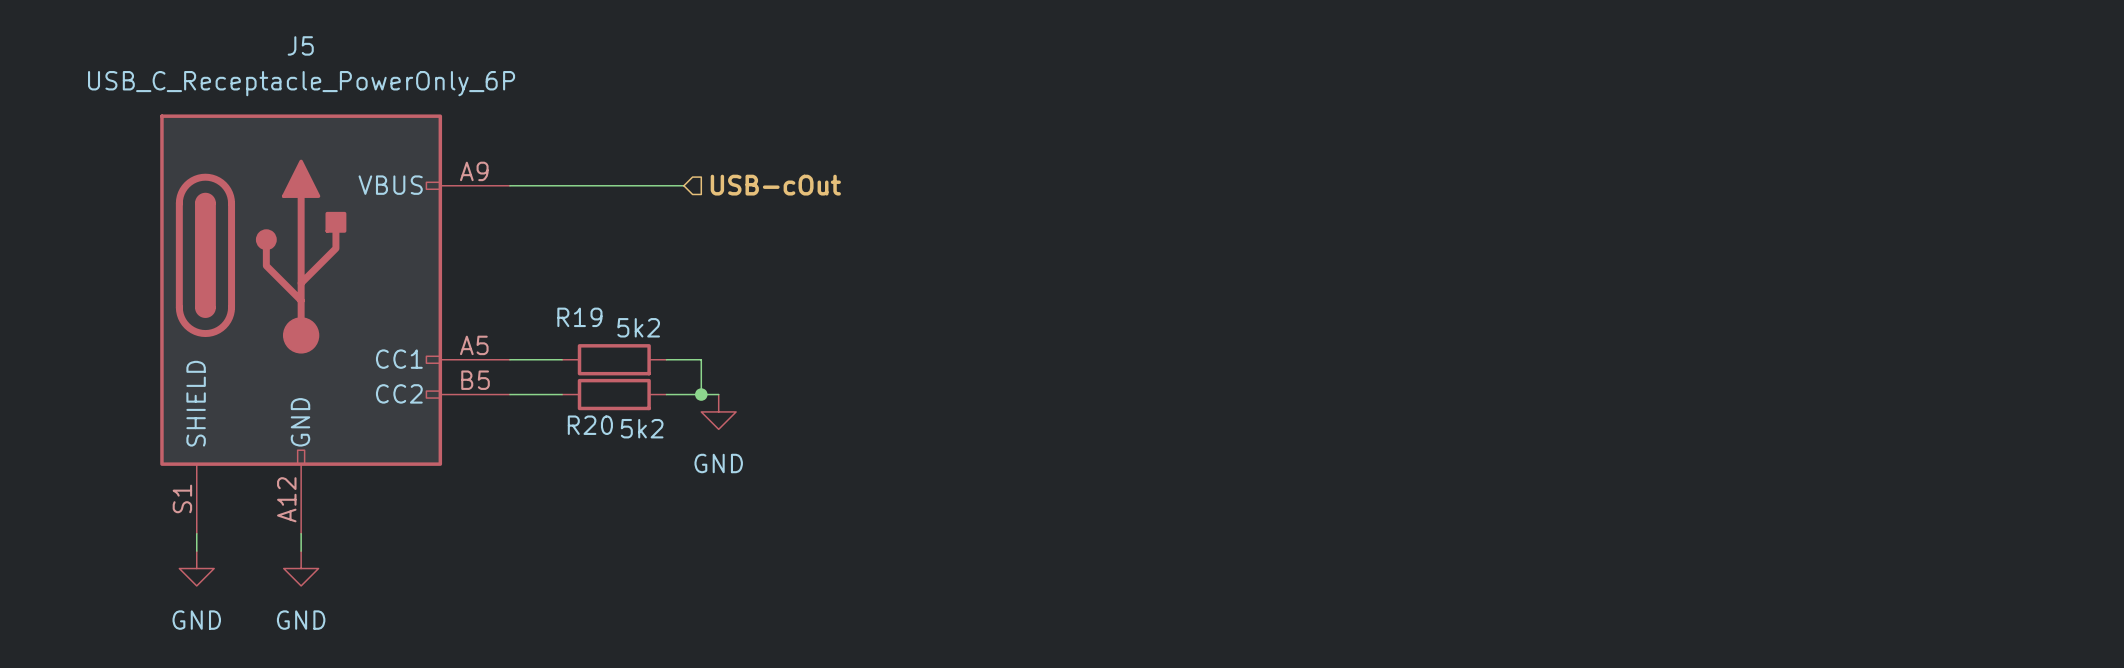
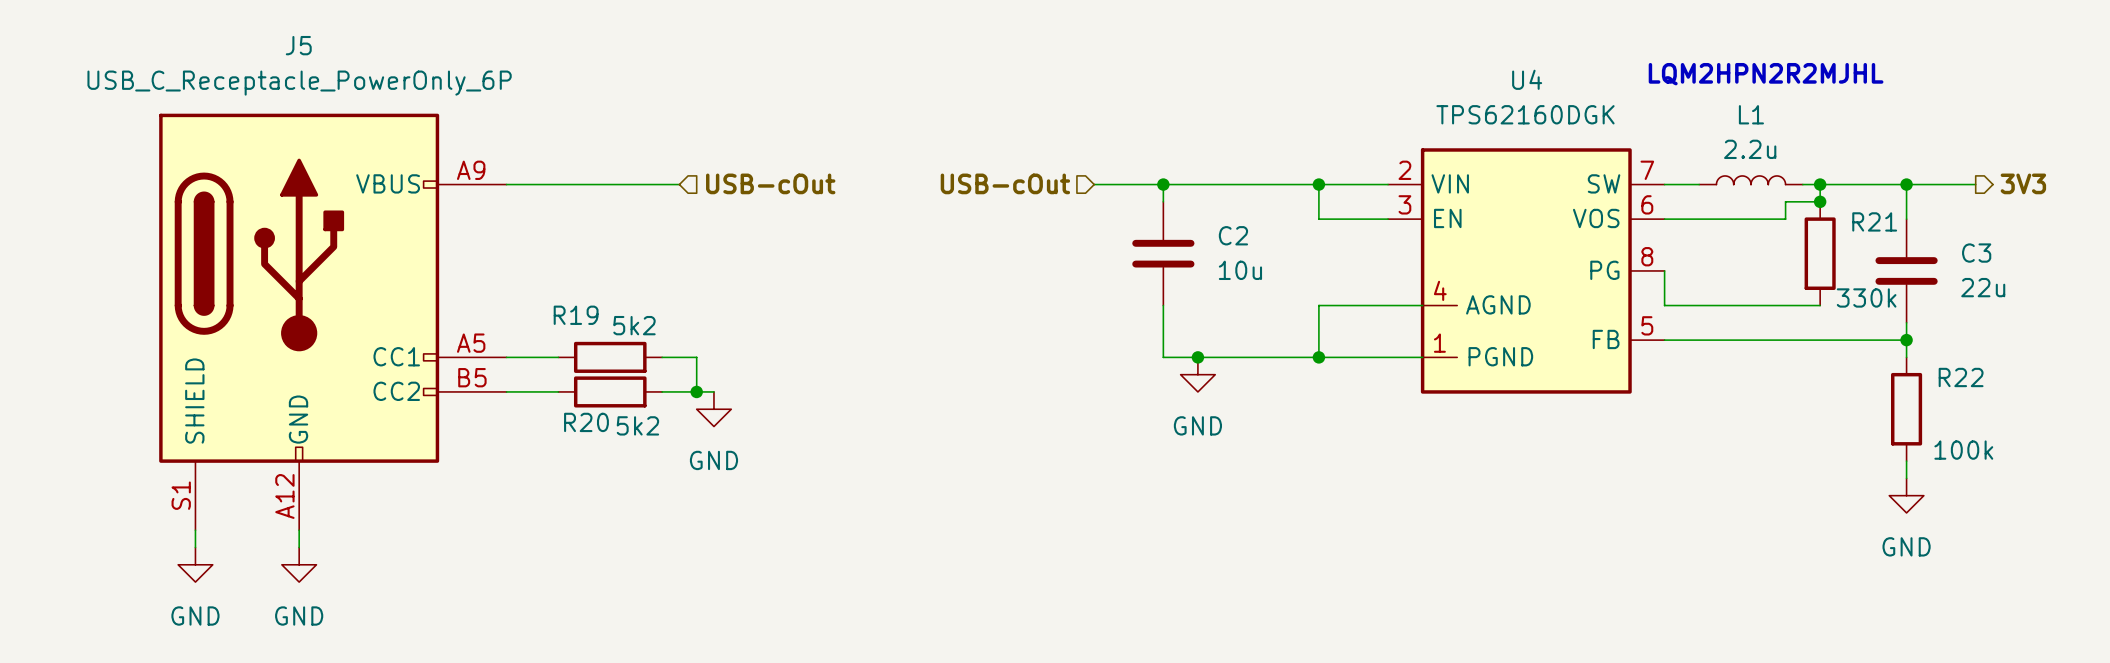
text: none -> LQM2HPN2R2MJHL (1766, 74)
L1: none -> 2.2u (1751, 180)
hierarchical label: none -> USB-cOut (1005, 183)
wire: none -> (1094, 184) (1388, 184)
wire: none -> (1163, 184) (1163, 201)
junction: none -> (1163, 184)
wire: none -> (1318, 184) (1318, 219) (1388, 219)
junction: none -> (1318, 184)
wire: none -> (1664, 184) (1699, 184)
wire: none -> (1802, 184) (1975, 184)
wire: none -> (1820, 184) (1820, 201) (1785, 201) (1785, 219) (1664, 219)
junction: none -> (1820, 184)
wire: none -> (1906, 184) (1906, 219)
junction: none -> (1906, 184)
hierarchical label: none -> 3V3 (2023, 183)
junction: none -> (1820, 201)
C2: none -> 10u (1163, 253)
R21: none -> 330k (1820, 253)
U4: none -> TPS62160DGK (1526, 270)
wire: none -> (1664, 270) (1664, 305) (1820, 305)
C3: none -> 22u (1906, 270)
wire: none -> (1163, 305) (1163, 357) (1422, 357)
wire: none -> (1422, 305) (1318, 305) (1318, 357)
wire: none -> (1906, 322) (1906, 357)
wire: none -> (1664, 340) (1906, 340)
junction: none -> (1906, 340)
junction: none -> (1197, 357)
junction: none -> (1318, 357)
power symbol: none -> GND (1197, 374)
R22: none -> 100k (1906, 409)
wire: none -> (1906, 461) (1906, 478)
power symbol: none -> GND (1906, 495)

